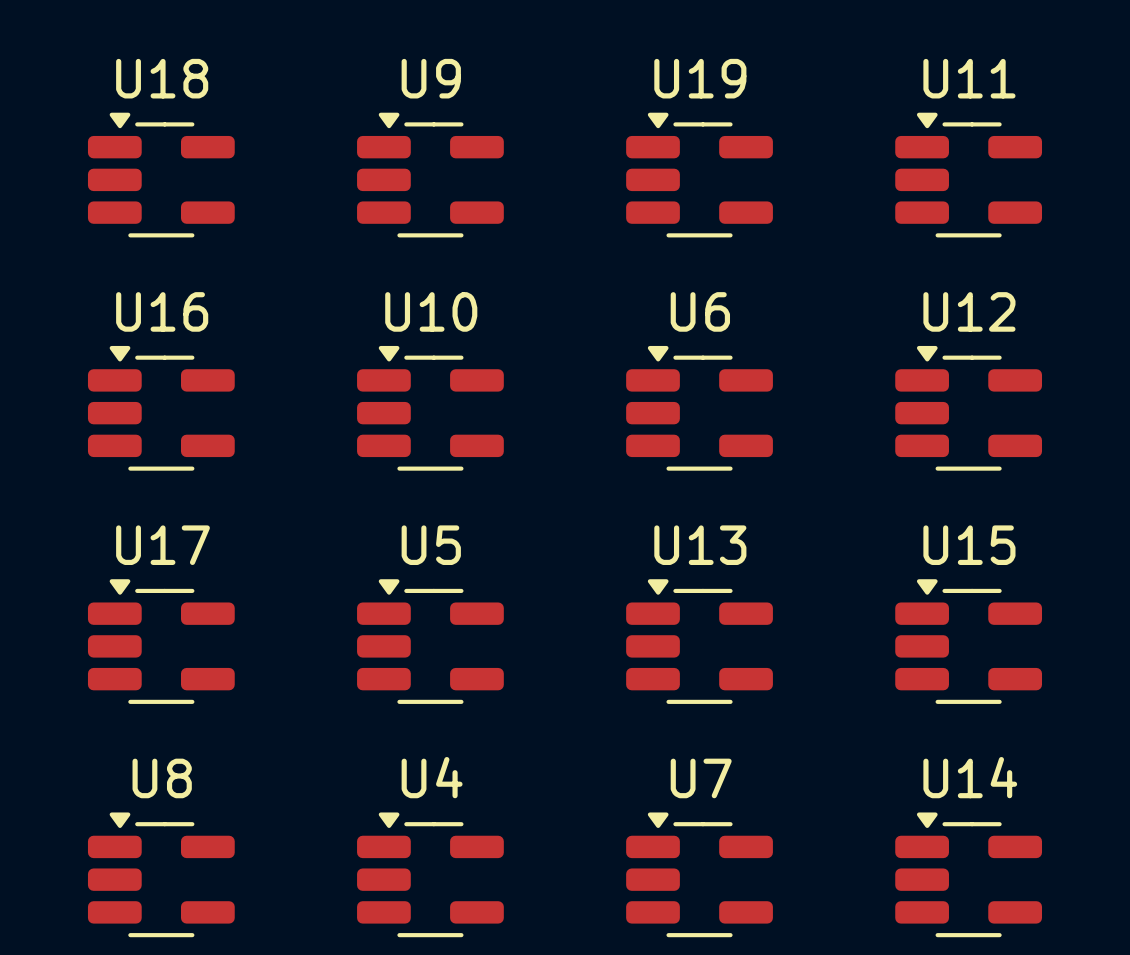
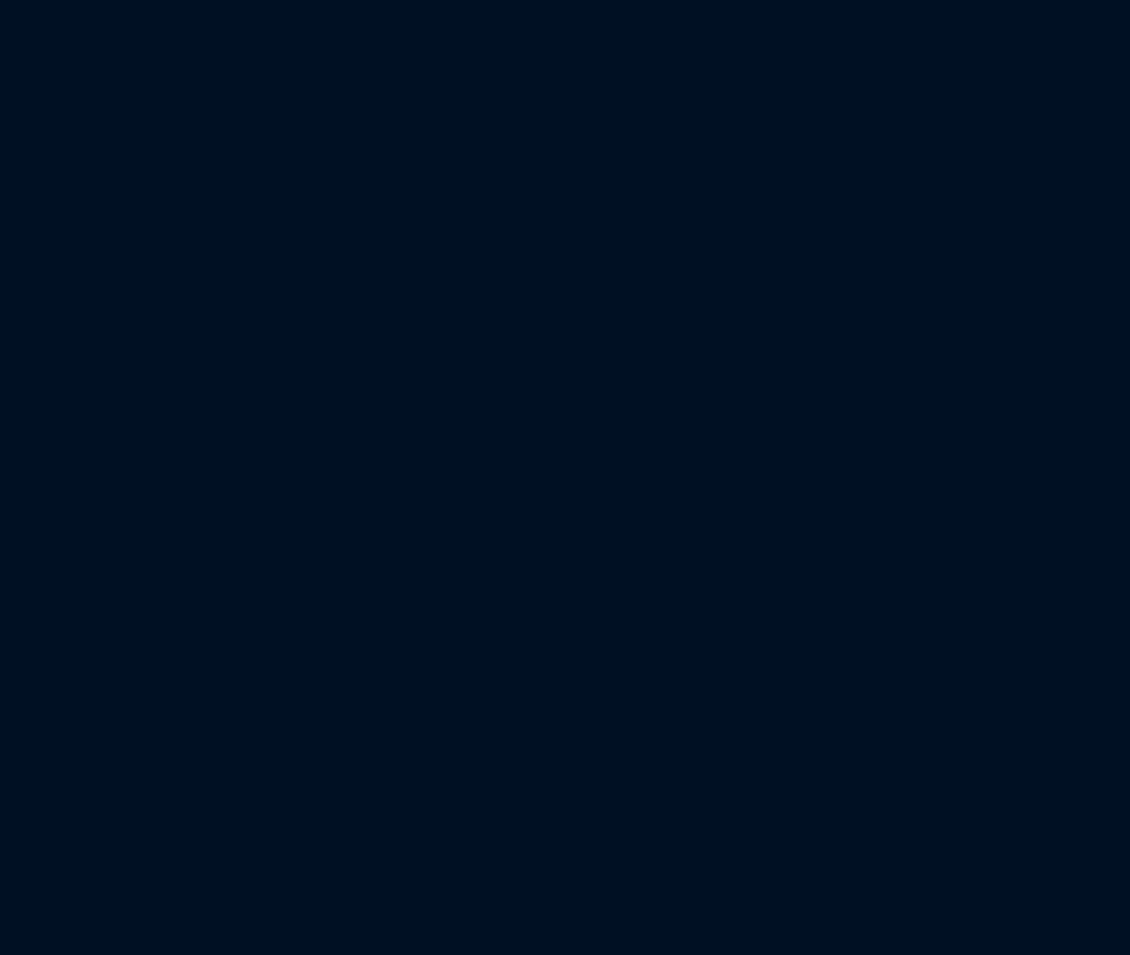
U18: (161, 175) -> none
U9: (430, 175) -> none
U19: (699, 175) -> none
U11: (968, 175) -> none
U16: (161, 408) -> none
U10: (430, 408) -> none
U6: (699, 408) -> none
U12: (968, 408) -> none
U17: (161, 641) -> none
U5: (430, 641) -> none
U13: (699, 641) -> none
U15: (968, 641) -> none
U8: (161, 874) -> none
U4: (430, 874) -> none
U7: (699, 874) -> none
U14: (968, 874) -> none

